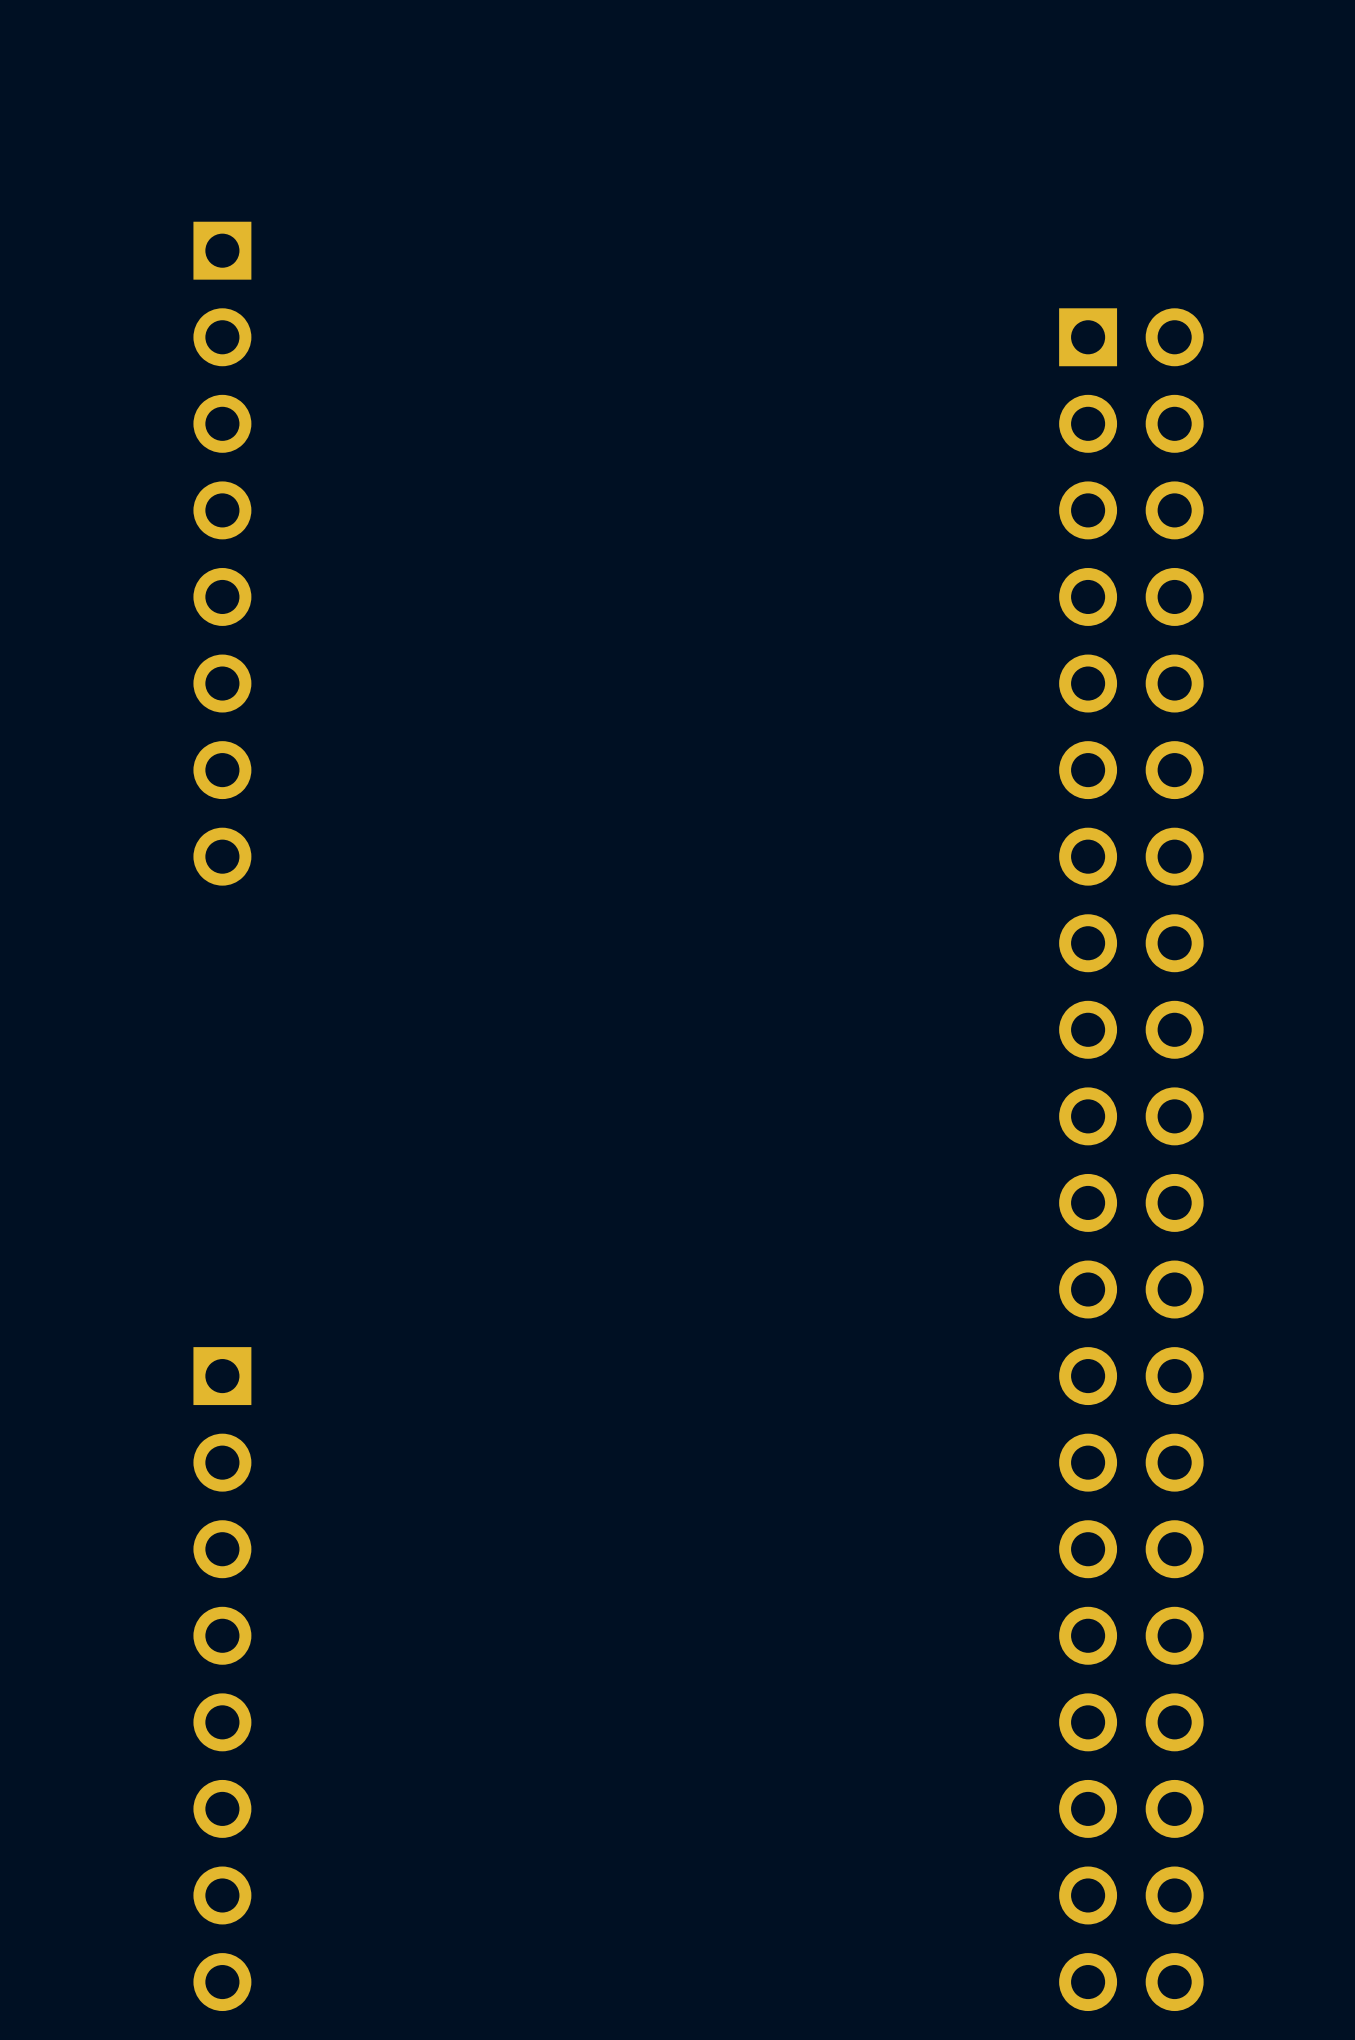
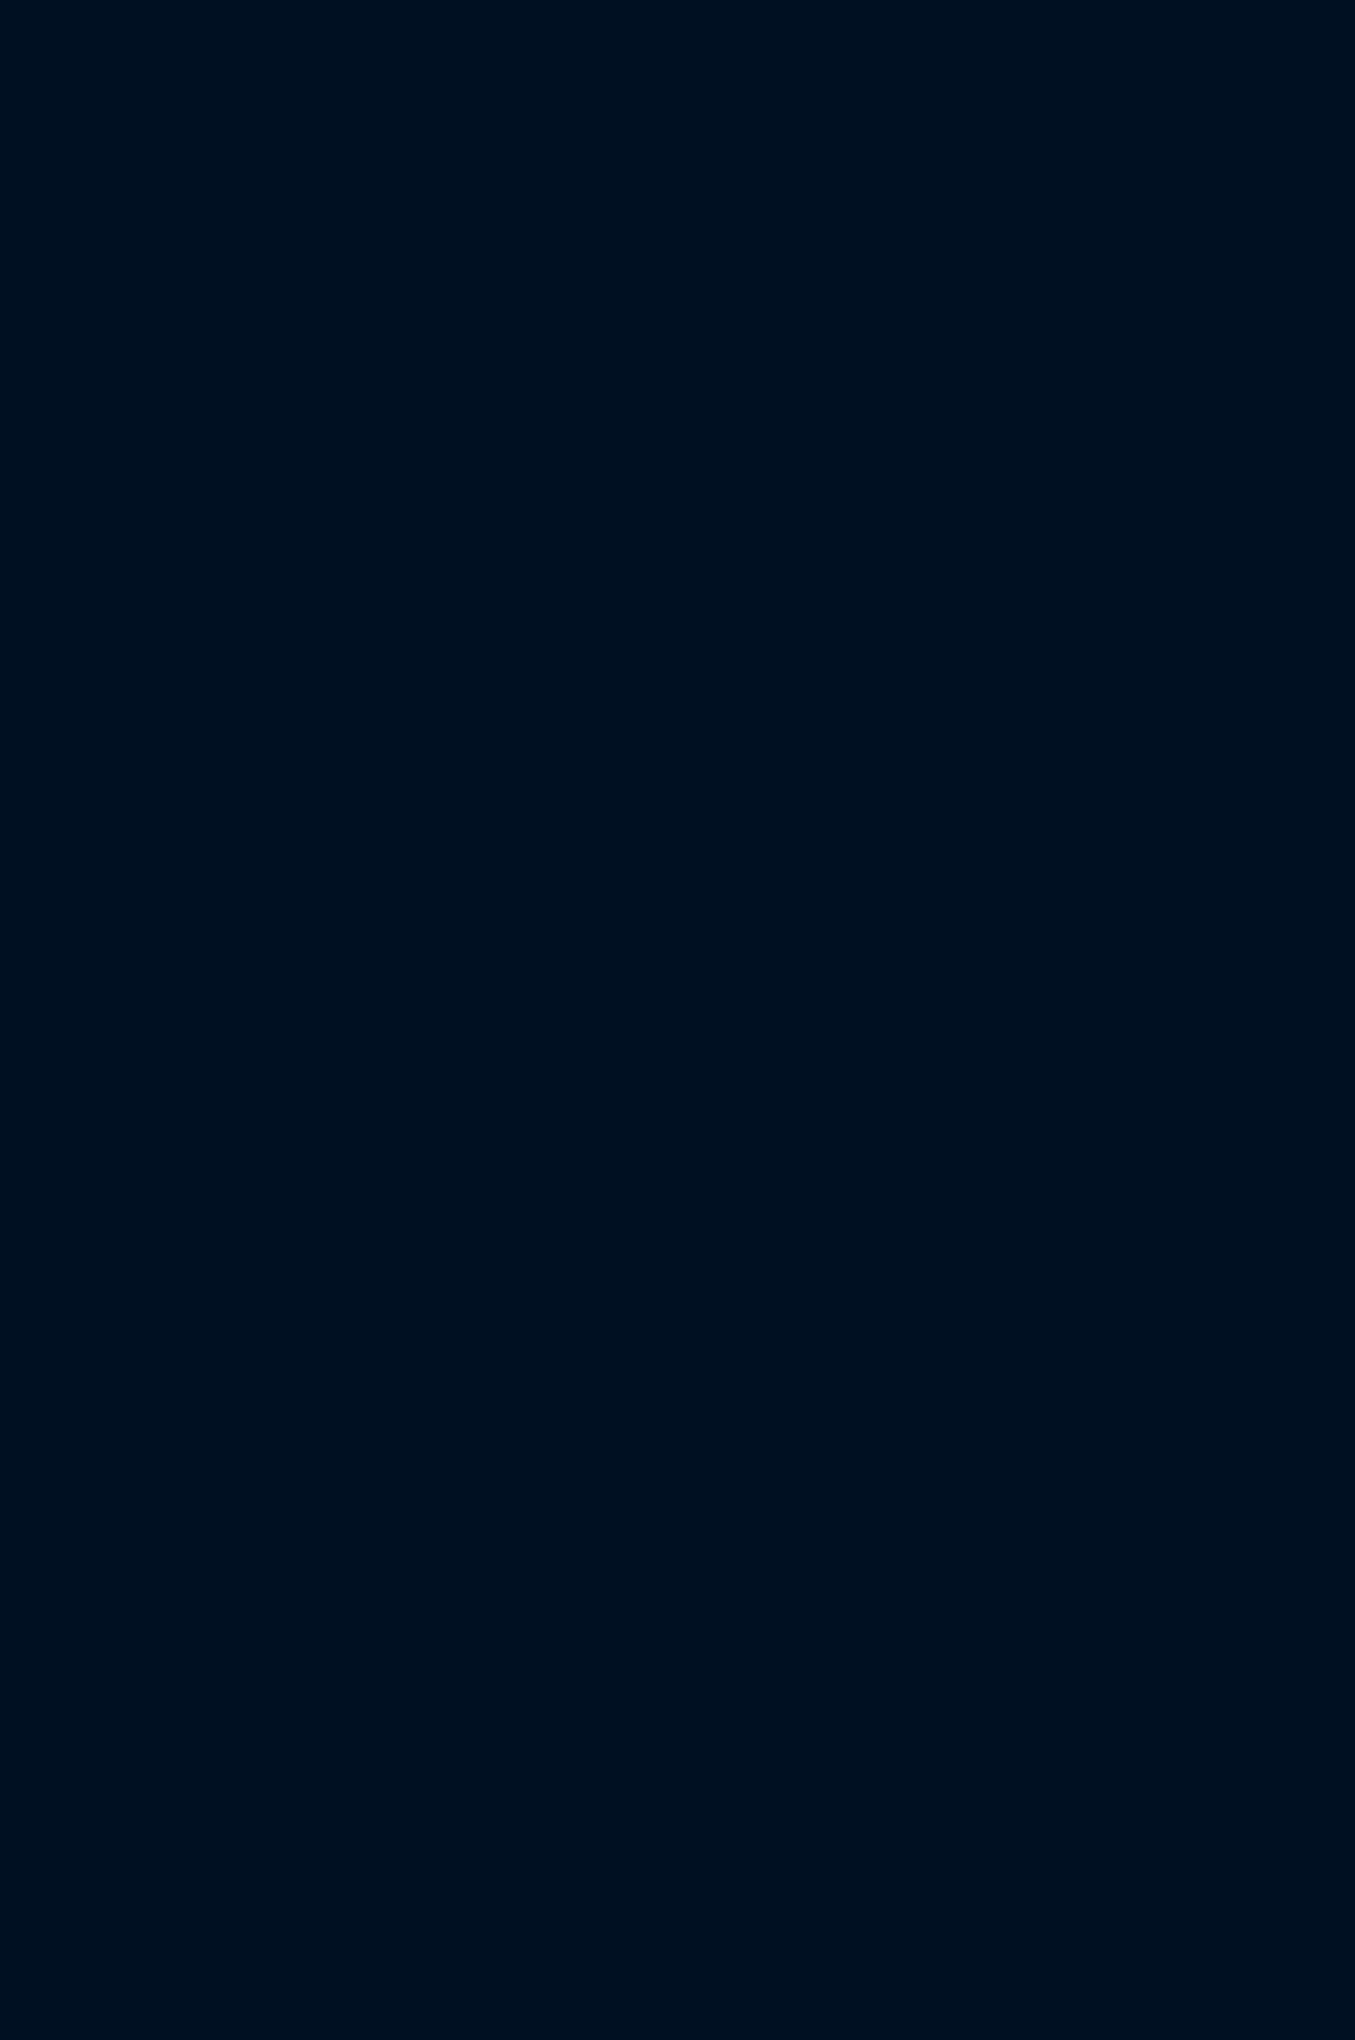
part: (222, 553) -> none
part: (1131, 1159) -> none
part: (222, 1679) -> none

